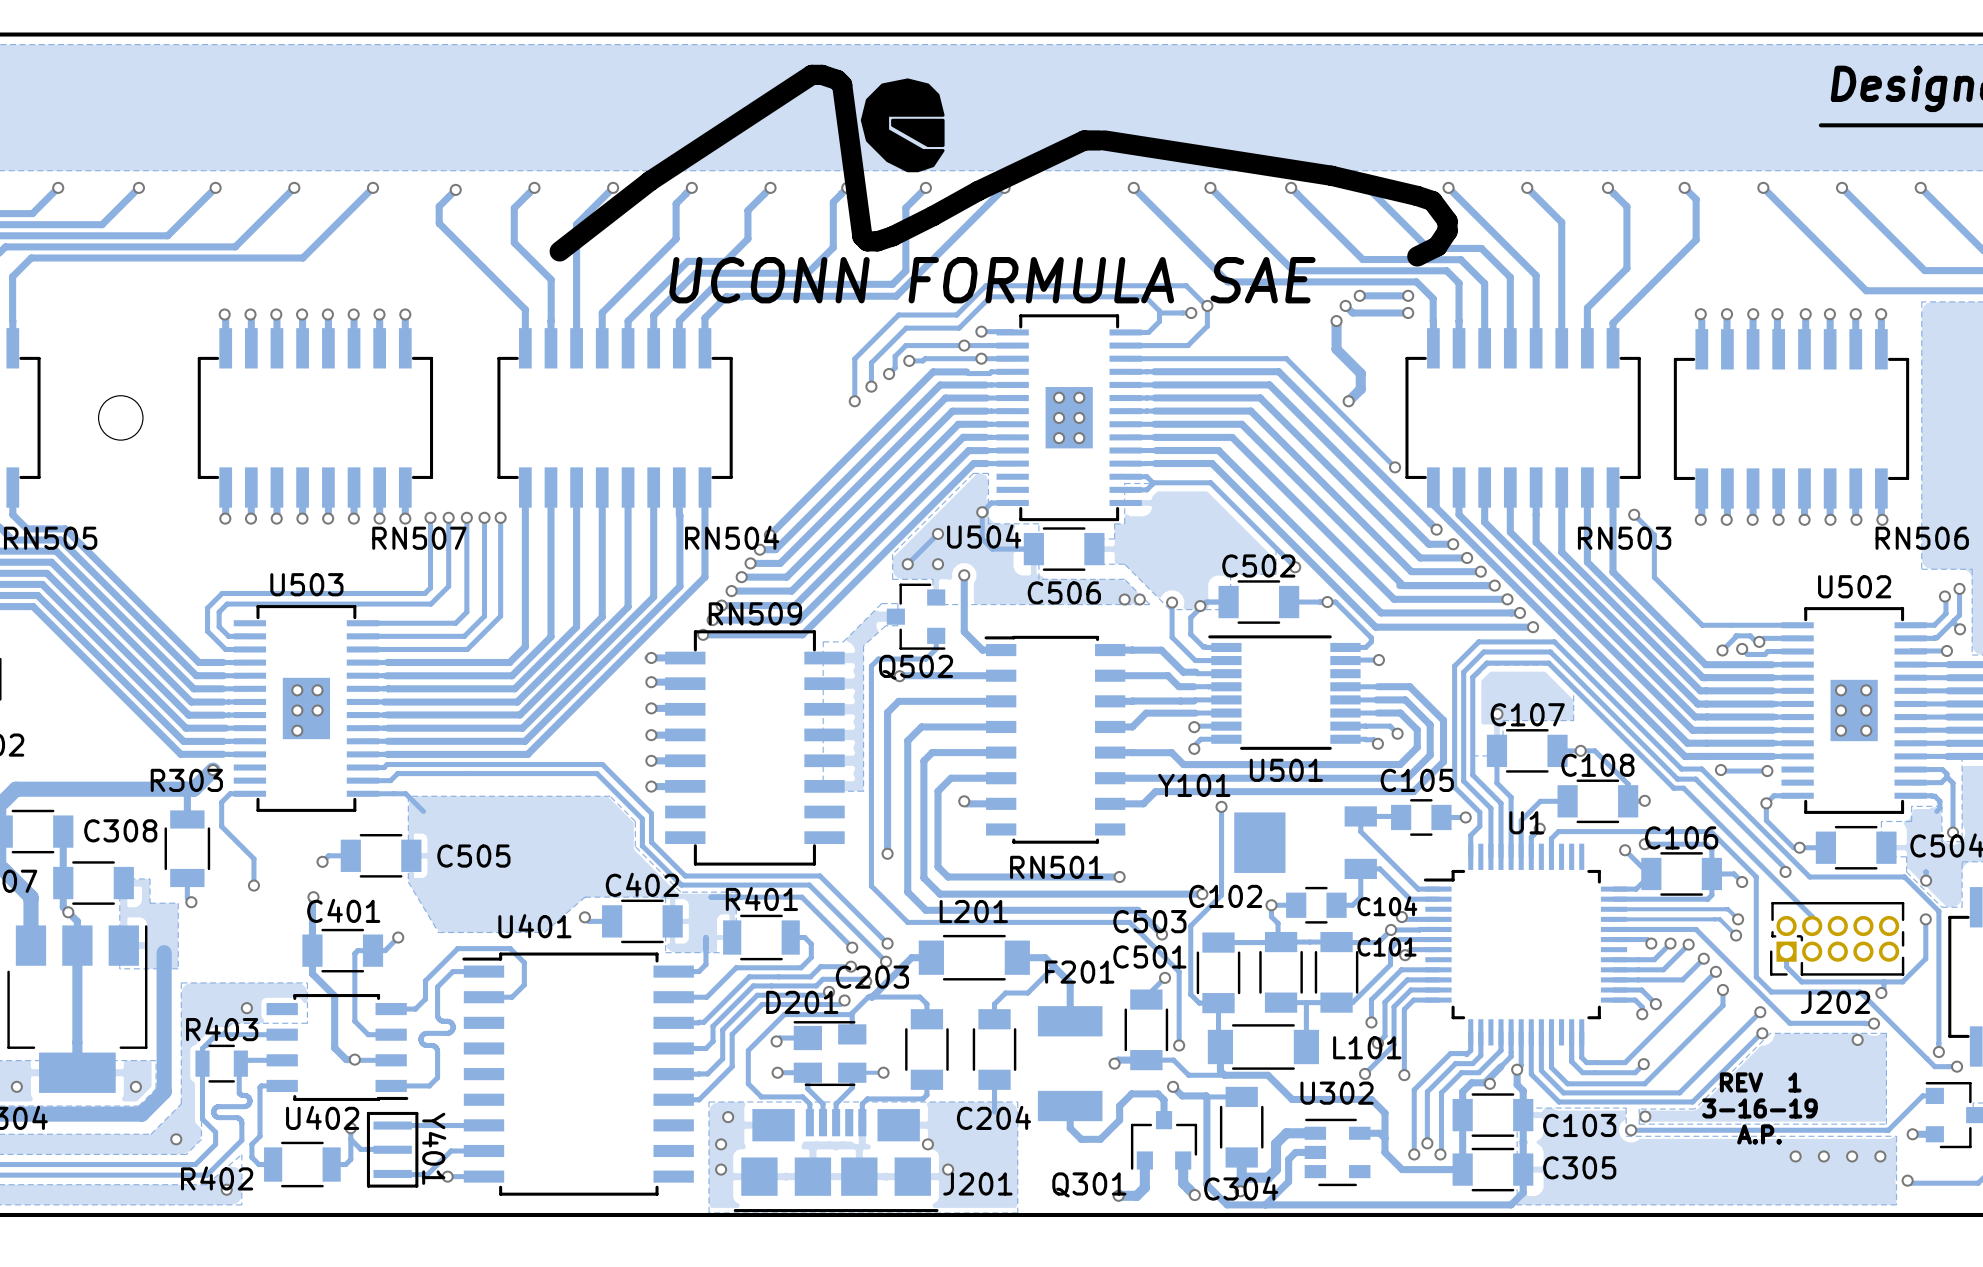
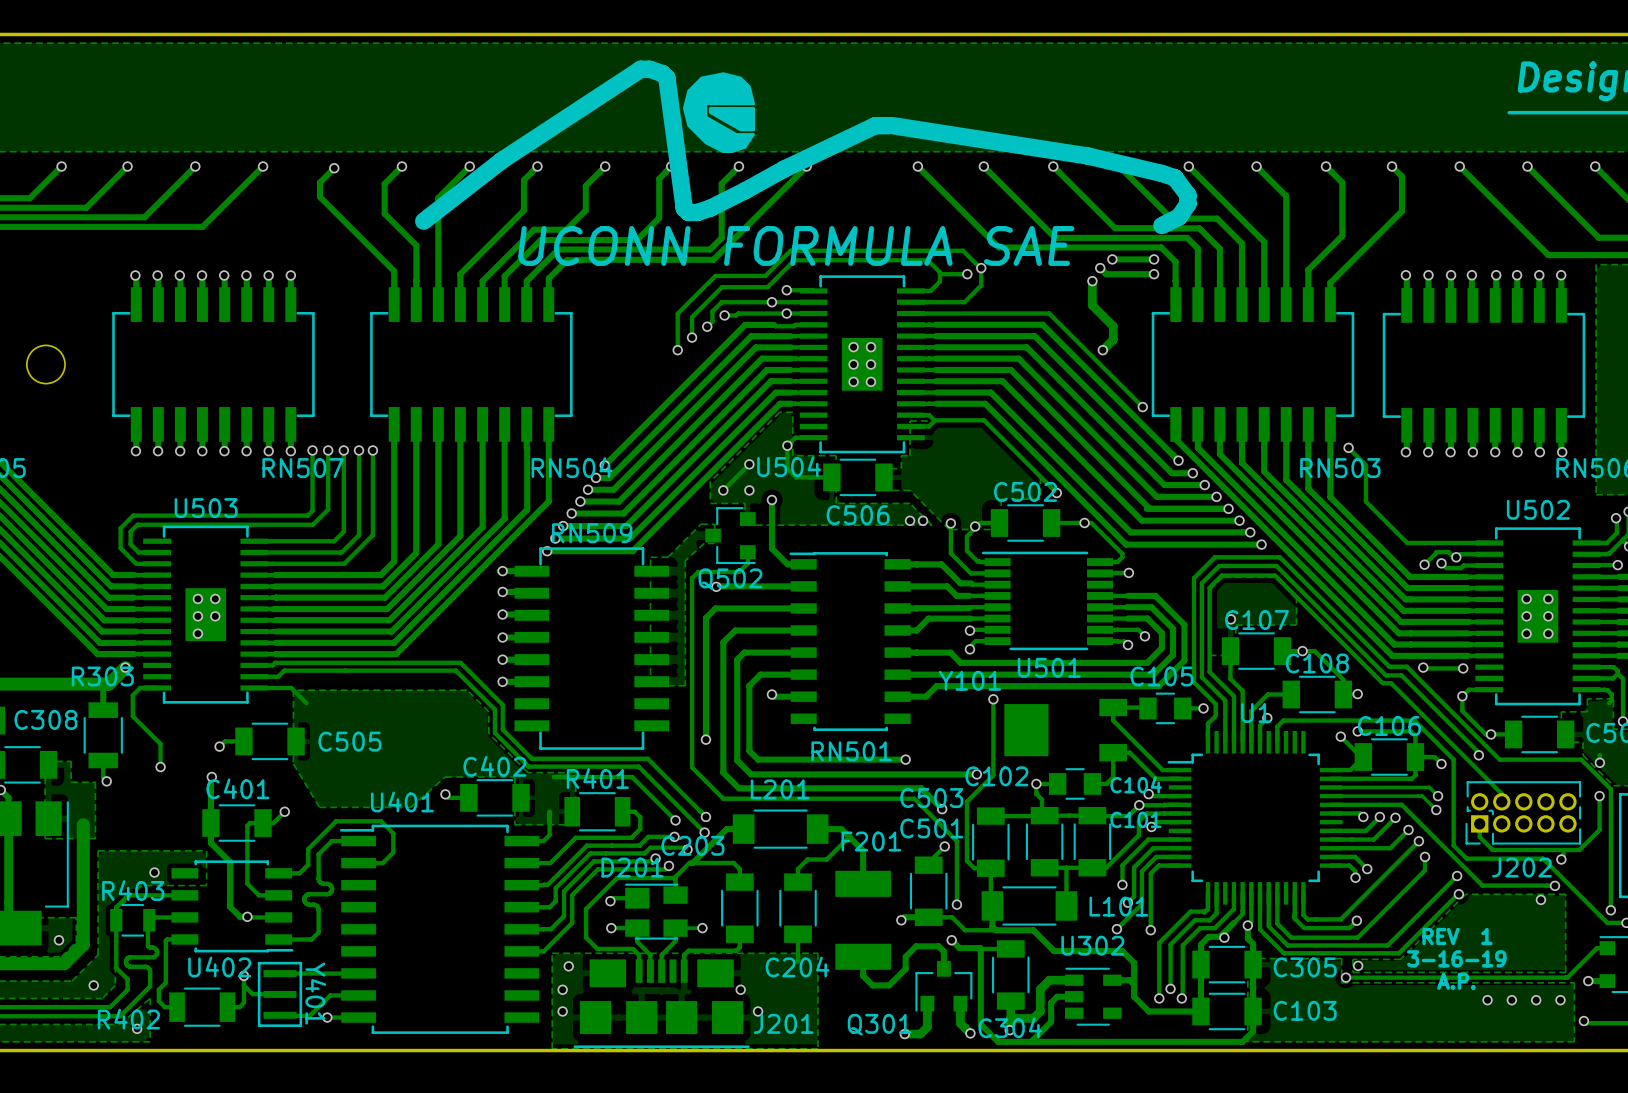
C103 name position: C103 (1579, 1125) -> C103 (1305, 1010)
C305 name position: C305 (1579, 1167) -> C305 (1305, 967)

